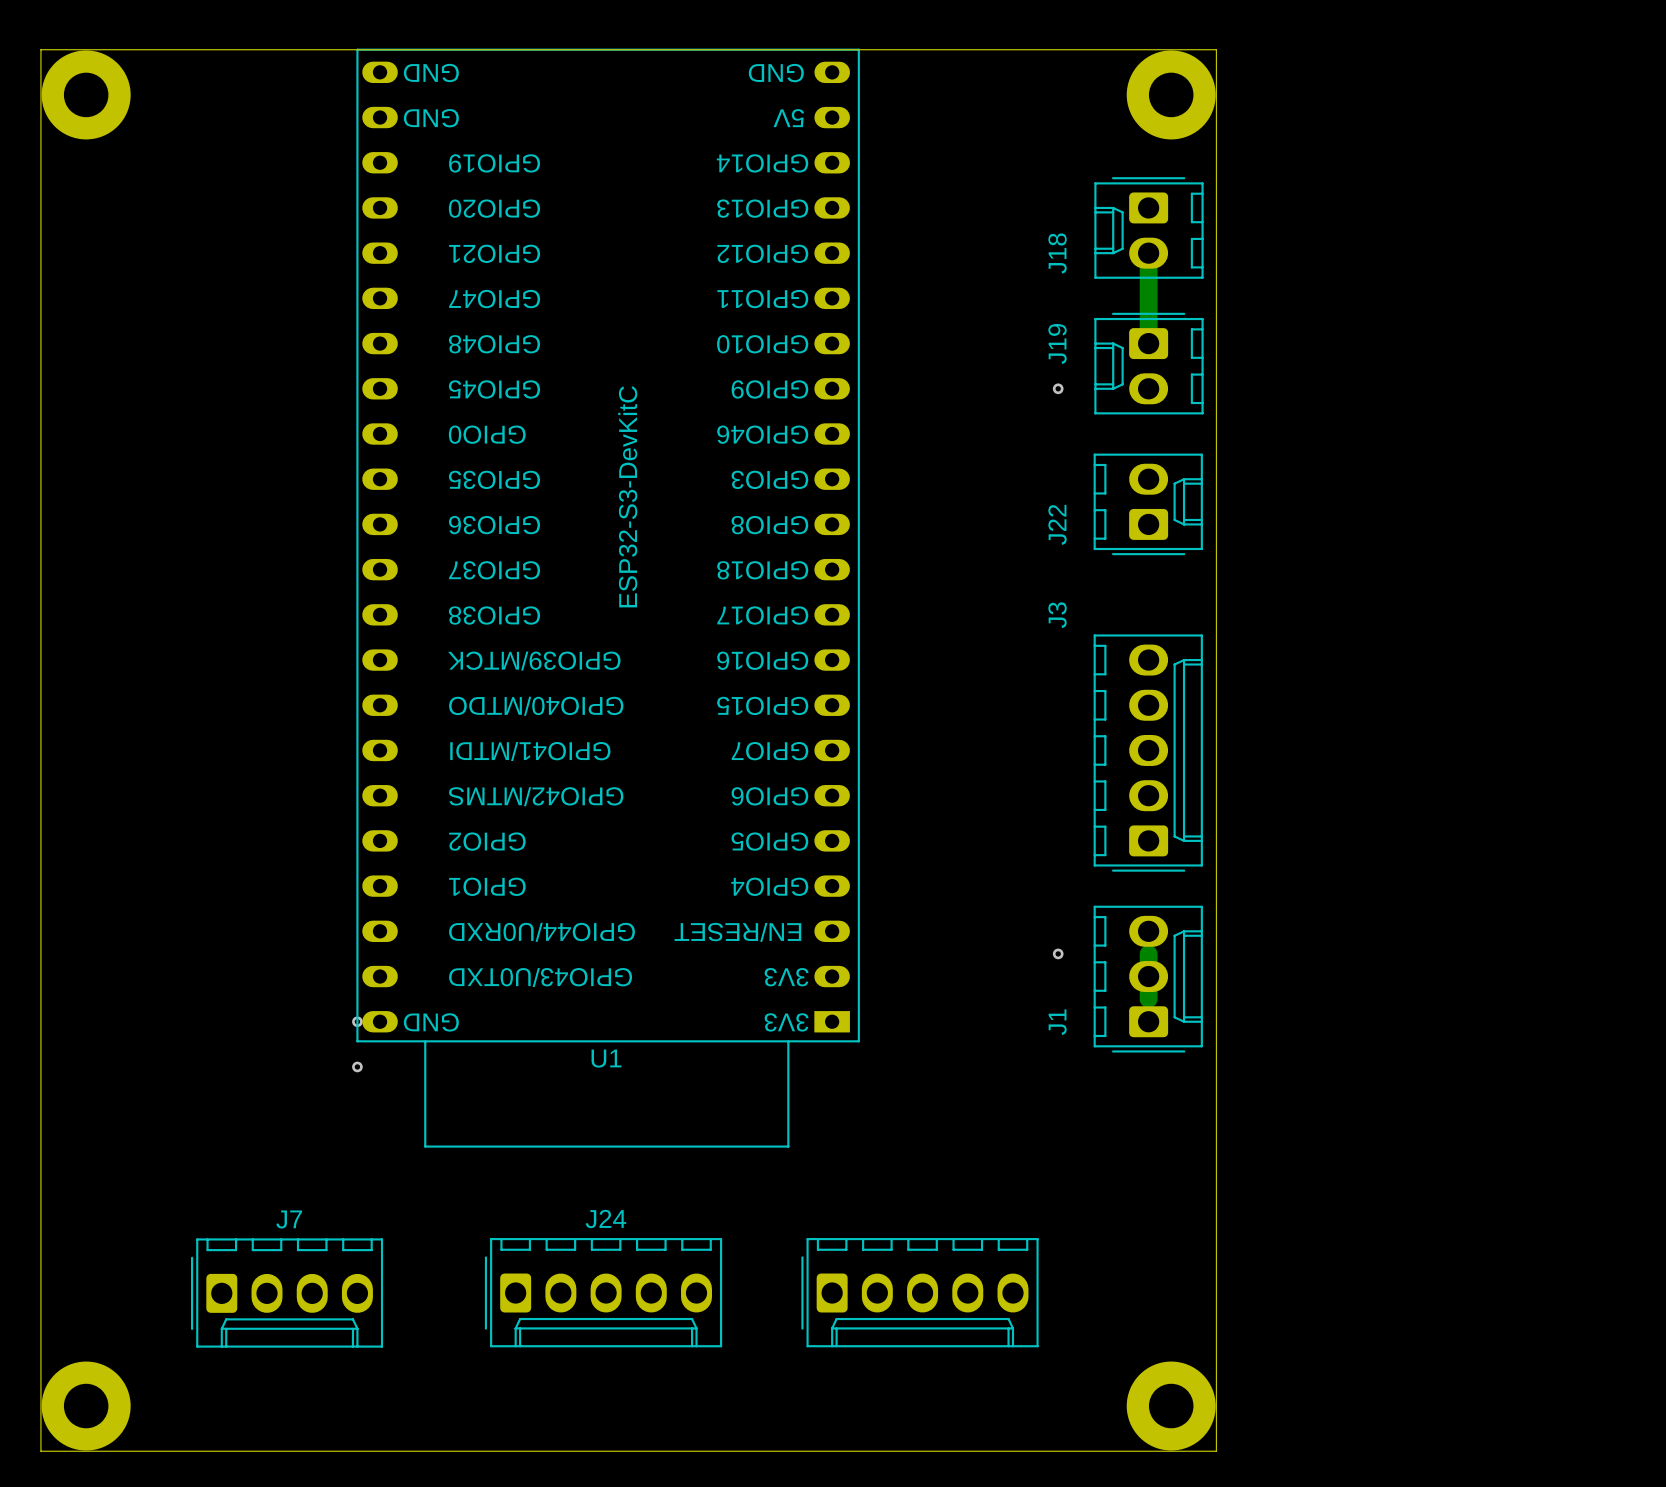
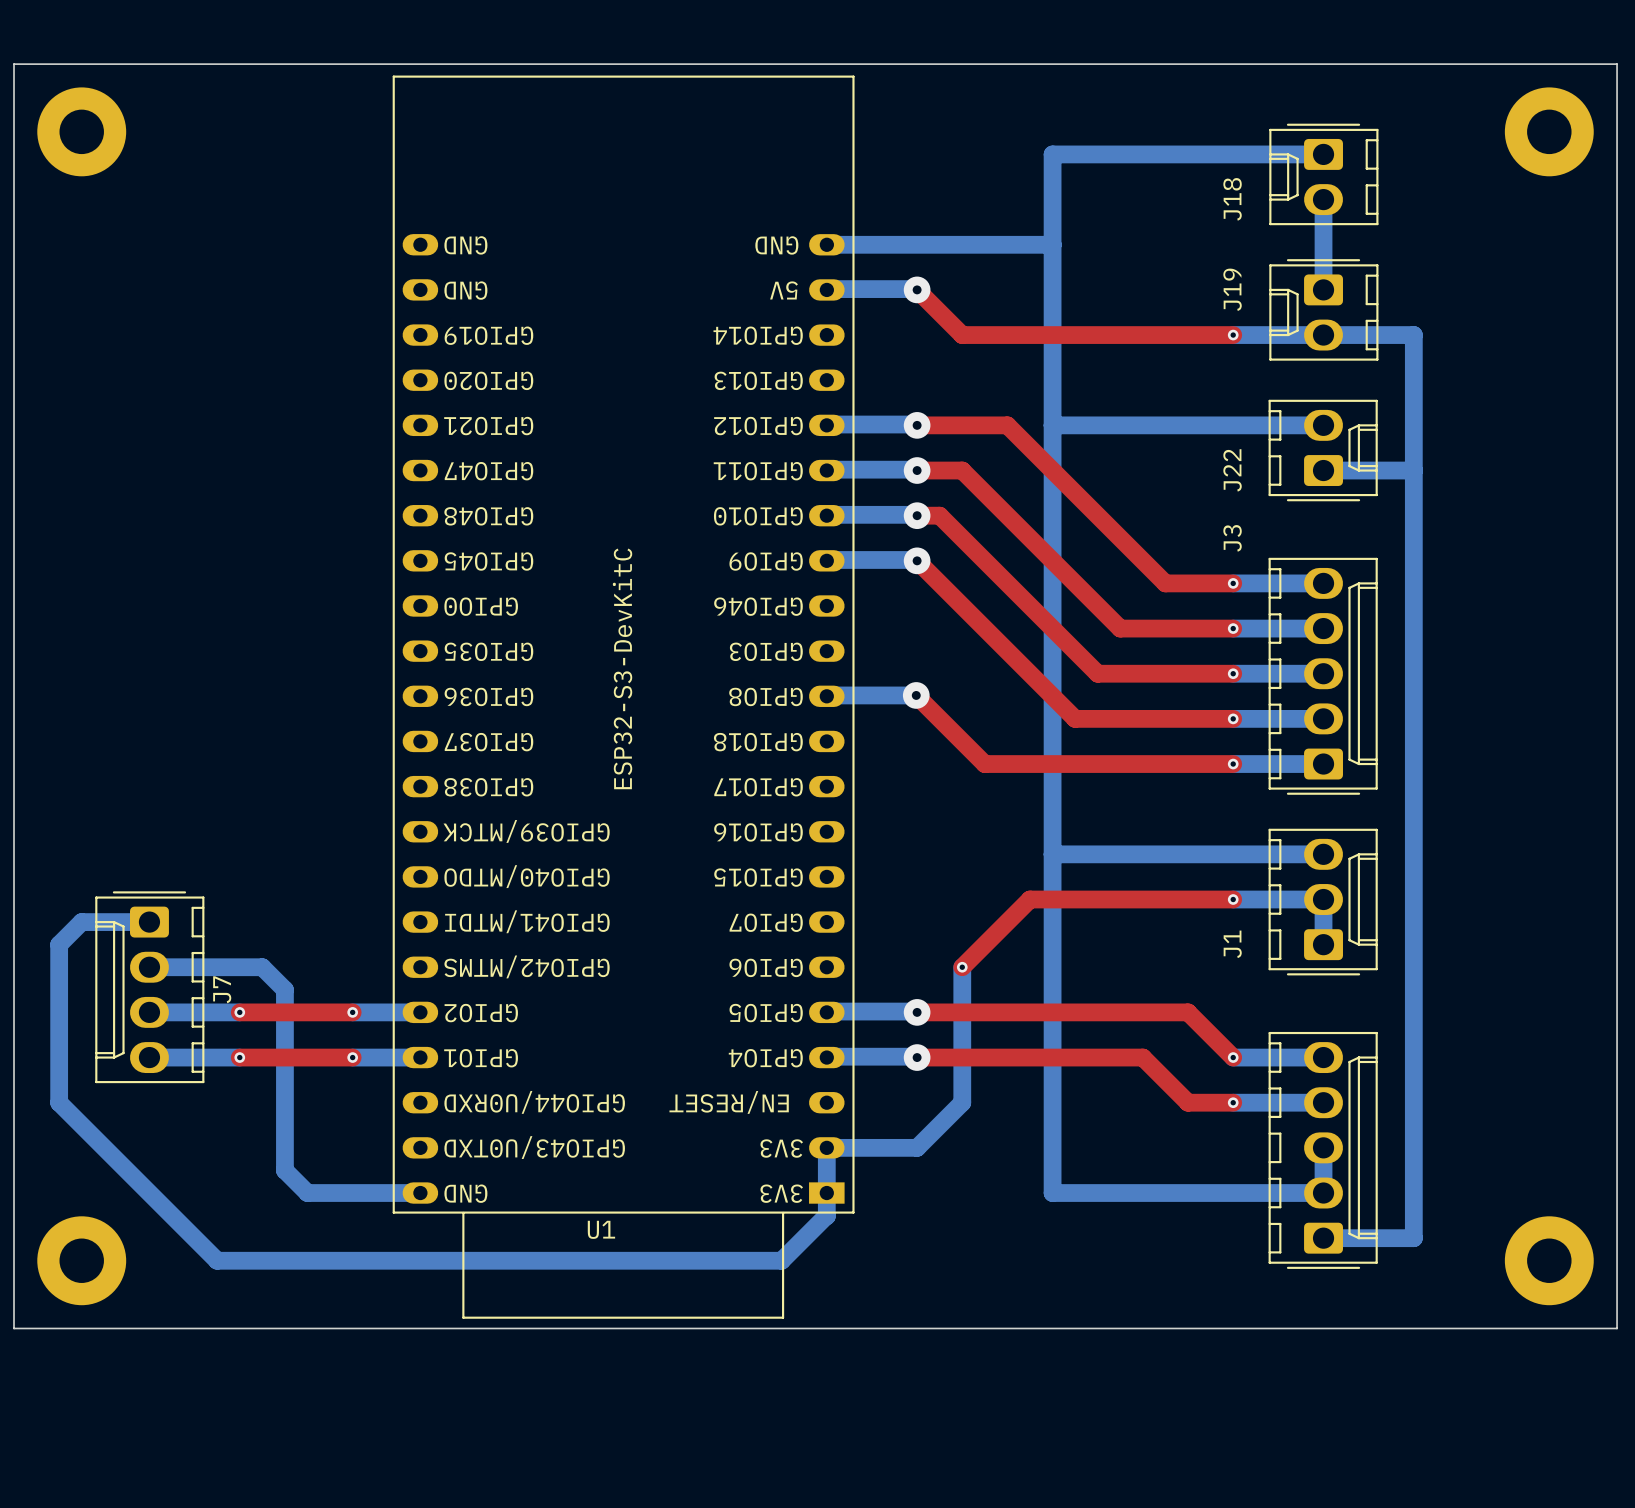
U1 footprint: [356, 48, 860, 1148] -> [392, 75, 855, 1319]
board edge: (40, 49) (1216, 49) (1216, 1451) (40, 1451) (40, 49) -> (14, 64) (14, 1328) (1617, 1328) (1617, 64) (14, 64)
part position: (86, 94) -> (81, 131)
part position: (1171, 94) -> (1549, 131)
bottom track: none -> (1323, 154) (1052, 154) (1052, 1193) (1323, 1193) (1323, 1147)
J18 position: (1148, 227) -> (1323, 174)
bottom track: none -> (826, 244) (1052, 244)
bottom track: (1148, 253) (1148, 343) -> (1323, 199) (1323, 289)
bottom track: none -> (827, 289) (917, 289)
top track: none -> (917, 289) (962, 335) (1233, 335)
via: none -> (917, 289)
bottom track: none -> (1233, 335) (1413, 335) (1413, 1238) (1323, 1238)
via: none -> (1233, 335)
J19 position: (1148, 363) -> (1323, 309)
via: (1058, 388) -> none
bottom track: none -> (827, 424) (917, 425)
top track: none -> (917, 425) (1007, 425) (1165, 583) (1233, 583)
via: none -> (917, 425)
bottom track: none -> (1052, 425) (1323, 425)
bottom track: none -> (827, 469) (917, 470)
top track: none -> (917, 470) (962, 470) (1120, 628) (1233, 628)
via: none -> (917, 470)
bottom track: none -> (1323, 470) (1413, 470)
U1 value position: ESP32-S3-DevKitC (627, 496) -> ESP32-S3-DevKitC (622, 668)
J22 position: (1148, 504) -> (1323, 450)
bottom track: none -> (827, 514) (917, 515)
top track: none -> (917, 515) (939, 515) (1097, 673) (1233, 673)
via: none -> (917, 515)
bottom track: none -> (827, 559) (917, 560)
top track: none -> (917, 560) (1075, 718) (1233, 718)
via: none -> (917, 560)
bottom track: none -> (1233, 583) (1323, 583)
via: none -> (1233, 583)
bottom track: none -> (1233, 628) (1323, 628)
via: none -> (1233, 628)
bottom track: none -> (1233, 673) (1323, 673)
via: none -> (1233, 673)
bottom track: none -> (827, 695) (917, 696)
top track: none -> (916, 695) (984, 764) (1233, 764)
via: none -> (916, 695)
bottom track: none -> (1233, 718) (1323, 718)
via: none -> (1233, 718)
J3 position: (1148, 753) -> (1323, 676)
bottom track: none -> (1233, 764) (1323, 764)
via: none -> (1233, 764)
bottom track: none -> (1052, 854) (1323, 854)
bottom track: none -> (1233, 899) (1323, 899) (1323, 944)
top track: none -> (1233, 899) (1030, 899) (962, 967)
via: none -> (1233, 899)
bottom track: none -> (149, 922) (81, 922) (59, 944) (59, 1102) (217, 1260) (781, 1260) (826, 1216) (826, 1147) (917, 1147) (962, 1102) (962, 967)
via: (1058, 953) -> none
bottom track: (1148, 953) (1148, 999) -> none
bottom track: none -> (149, 967) (262, 967) (284, 989) (284, 1170) (307, 1193) (420, 1193)
via: none -> (962, 967)
J1 position: (1148, 979) -> (1323, 902)
bottom track: none -> (827, 1011) (917, 1012)
bottom track: none -> (149, 1012) (239, 1012)
top track: none -> (239, 1012) (352, 1012)
via: none -> (239, 1012)
bottom track: none -> (352, 1012) (420, 1012)
top track: none -> (917, 1012) (1188, 1012) (1233, 1057)
via: none -> (917, 1012)
U1 name position: U1 (606, 1058) -> U1 (601, 1229)
bottom track: none -> (149, 1057) (239, 1057)
top track: none -> (239, 1057) (352, 1057)
via: none -> (239, 1057)
bottom track: none -> (352, 1057) (420, 1057)
bottom track: none -> (826, 1057) (917, 1057)
top track: none -> (917, 1057) (1142, 1057) (1188, 1102) (1233, 1102)
via: none -> (917, 1057)
bottom track: none -> (1233, 1057) (1323, 1057)
via: none -> (1233, 1057)
bottom track: none -> (1233, 1102) (1323, 1102)
via: none -> (1233, 1102)
J24: (603, 1292) -> none
part rotation: 0° (919, 1292) -> 90° counterclockwise (1323, 1150)
part position: (919, 1292) -> (1323, 1150)
J7 rotation: 0° (287, 1293) -> 90° clockwise (149, 987)
J7 position: (287, 1293) -> (149, 987)
part position: (86, 1406) -> (81, 1260)
part position: (1171, 1406) -> (1549, 1260)

